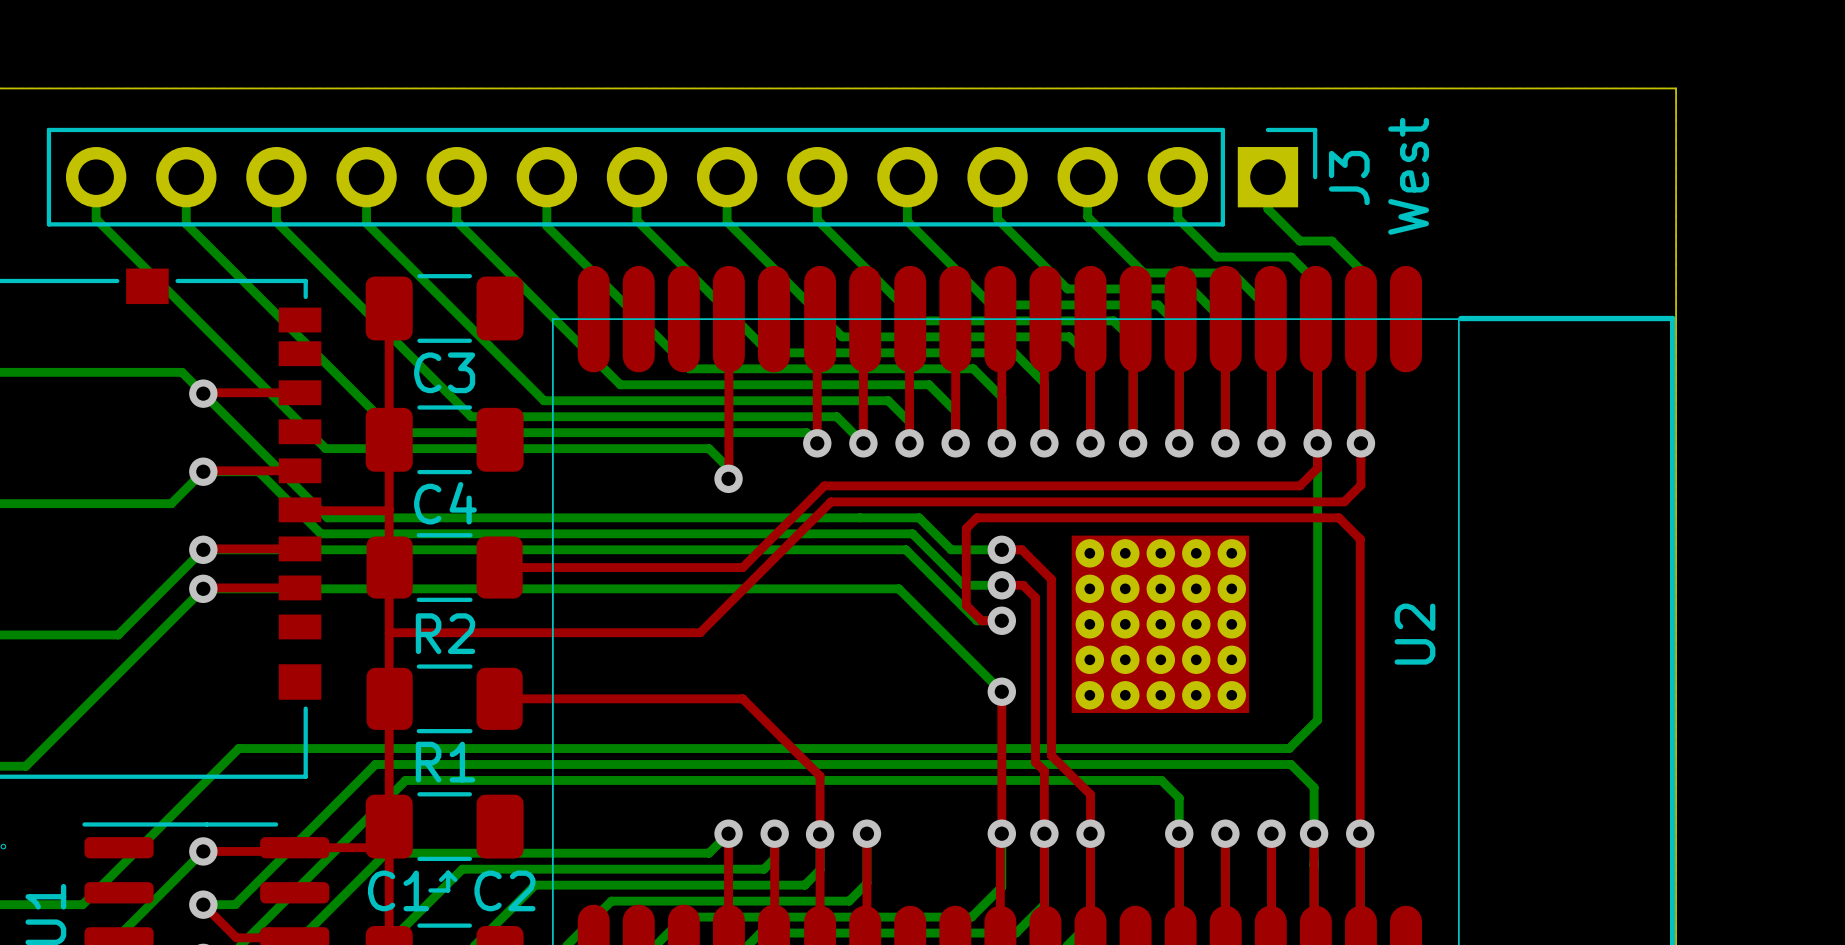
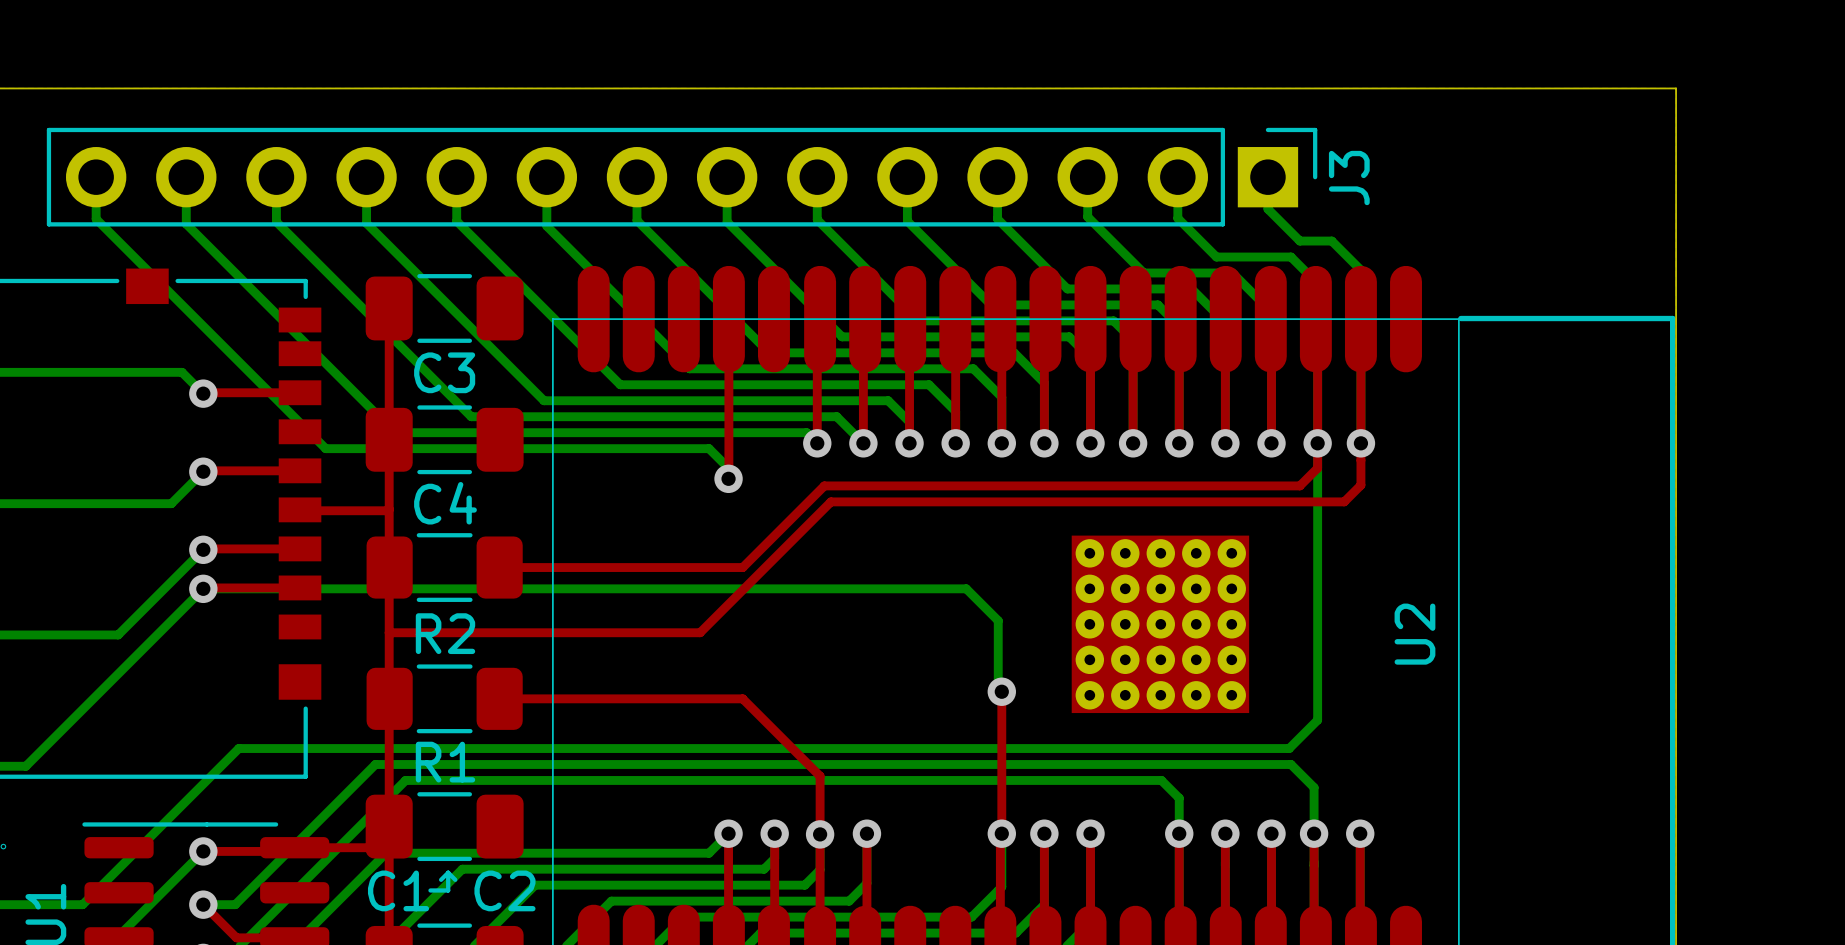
J3 value: West (1408, 176) -> none
bottom track: (203, 393) (327, 517) (919, 517) (951, 549) (1001, 549) -> none
bottom track: (203, 471) (258, 471) (320, 533) (912, 533) (964, 585) (1001, 585) -> none
bottom track: (203, 549) (905, 549) (976, 620) (1001, 620) -> none
top track: (1001, 549) (1021, 549) (1051, 579) (1051, 755) (1090, 794) (1090, 833) -> none
via: (1001, 549) -> none
top track: (1001, 585) (1023, 585) (1035, 597) (1035, 762) (1044, 771) (1044, 833) -> none
via: (1001, 585) -> none
bottom track: (898, 588) (1001, 691) -> (898, 588) (966, 588) (998, 620) (998, 691)
top track: (1001, 620) (981, 620) (966, 605) (966, 528) (976, 517) (1338, 517) (1360, 539) (1360, 833) -> none
via: (1001, 620) -> none

